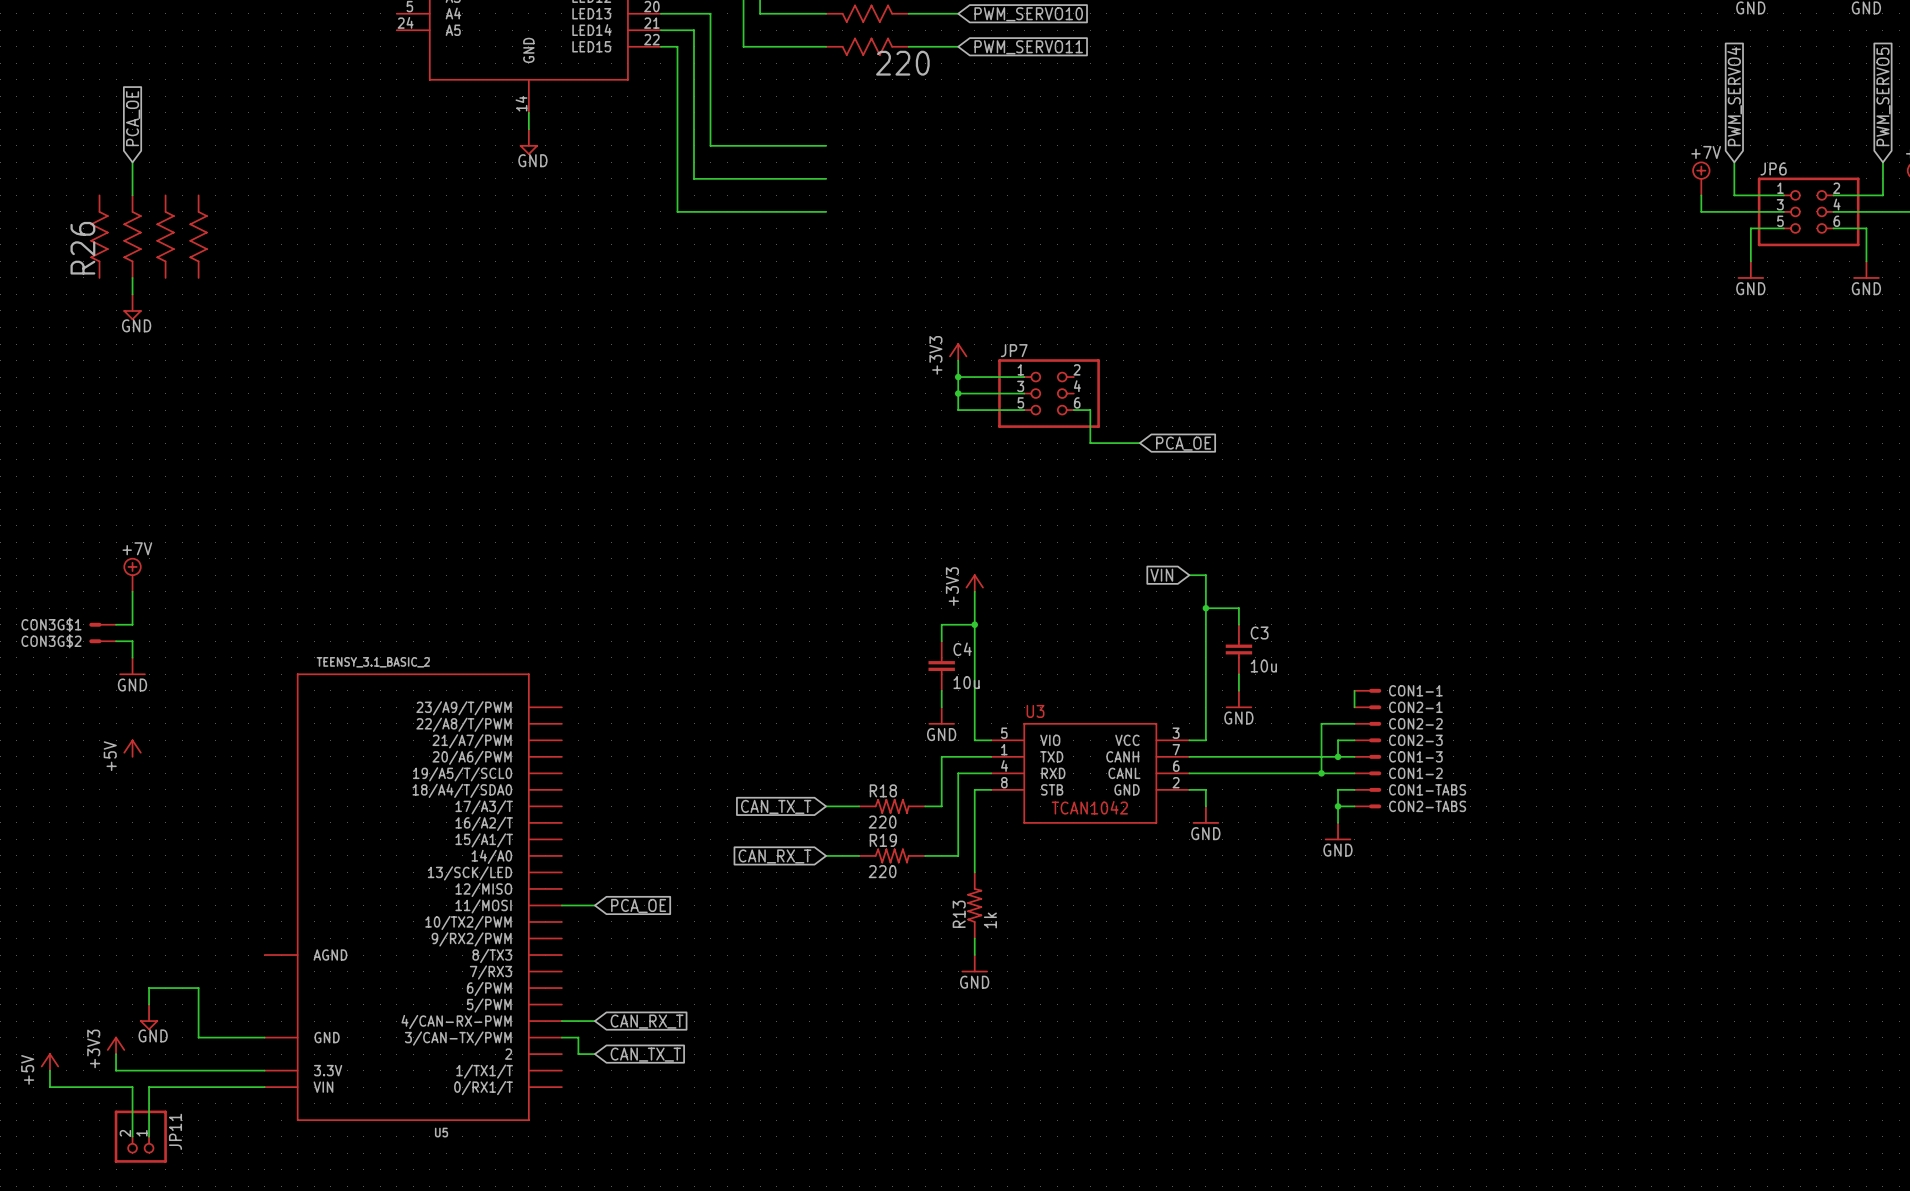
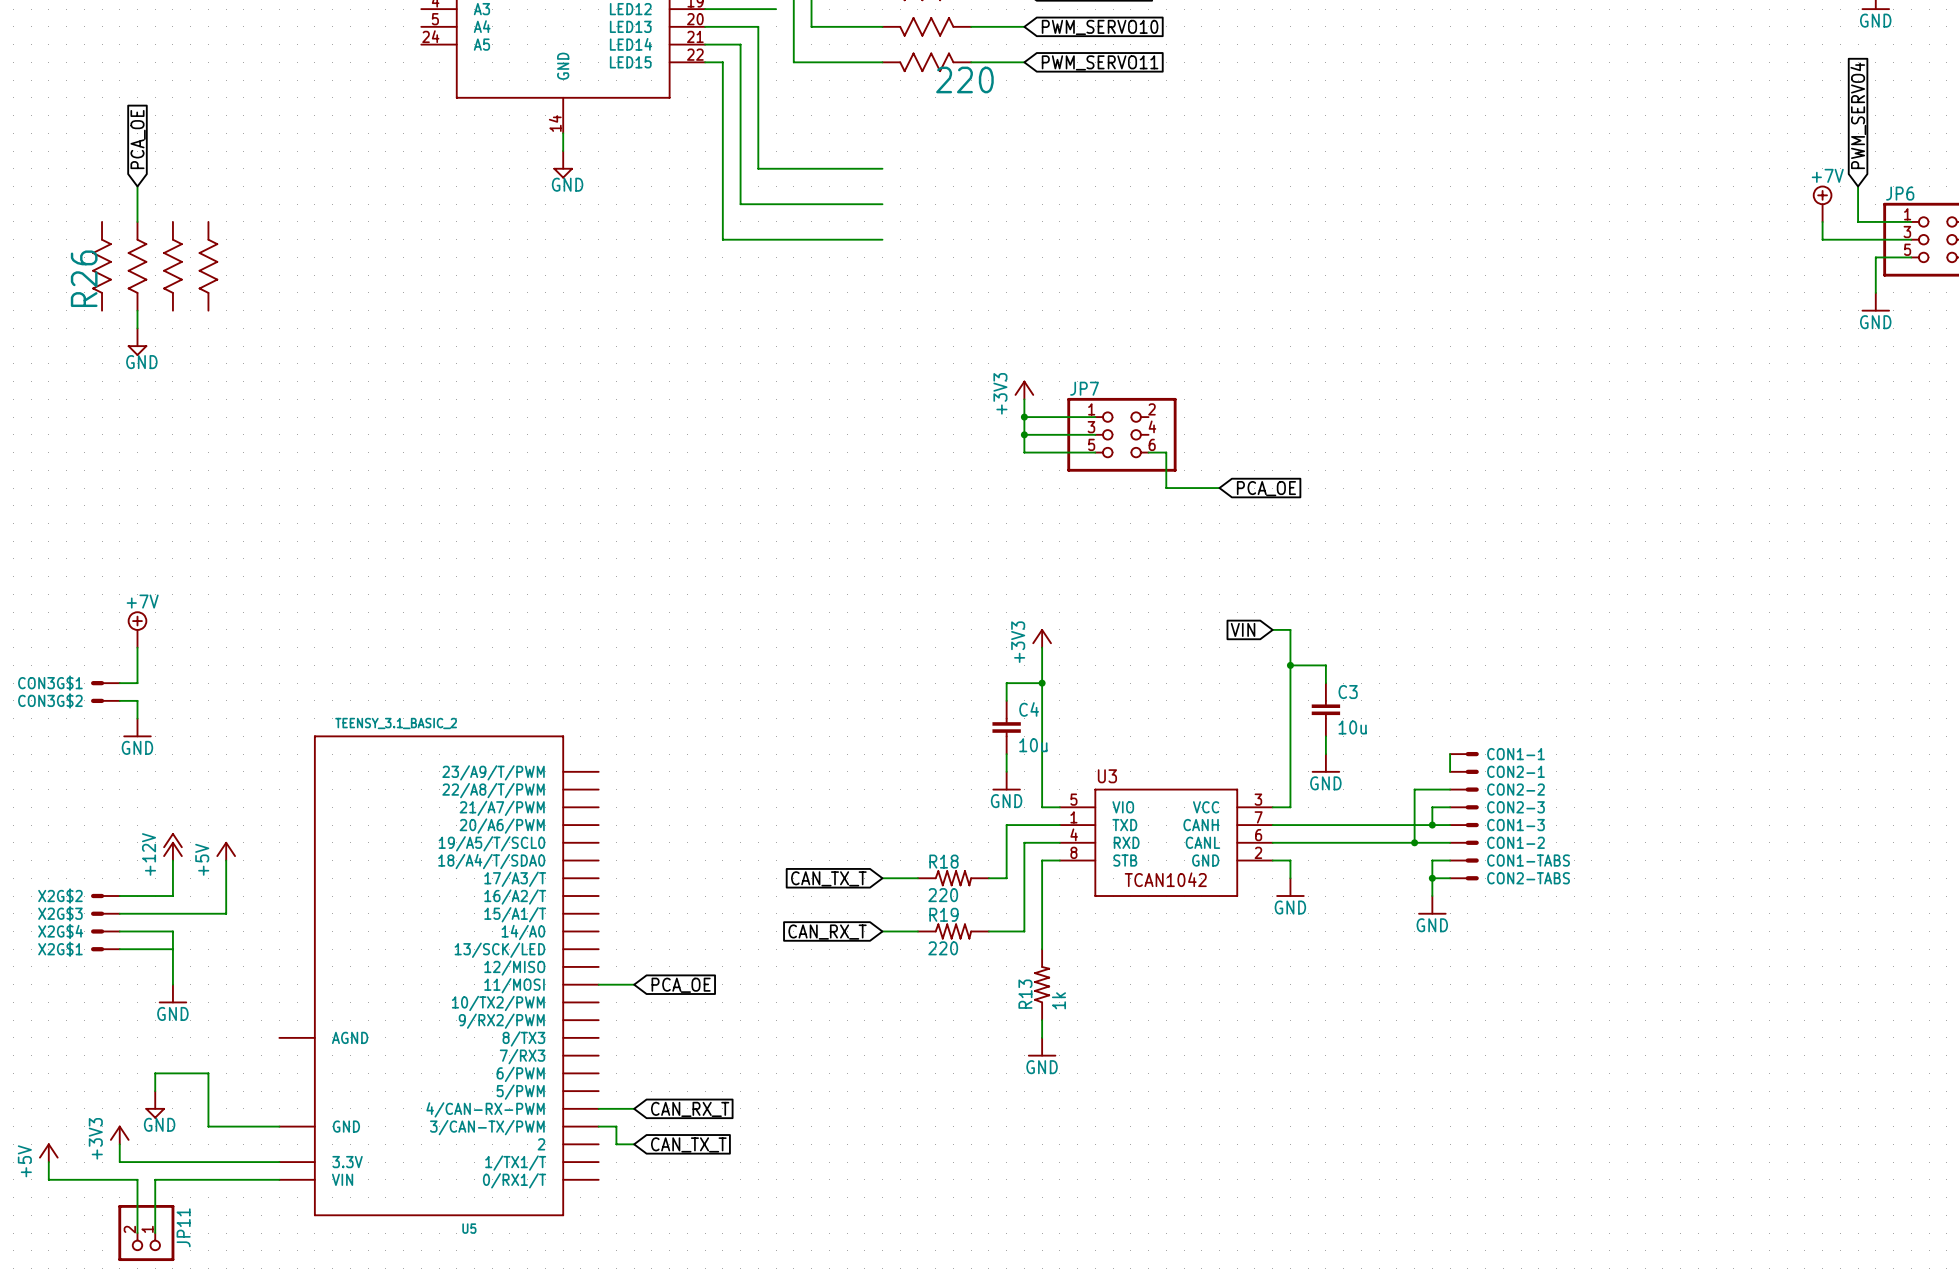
power symbol position: +5V (132, 748) -> +5V (226, 851)
power symbol: none -> +12V (172, 846)
wire: none -> (172, 860) (172, 896) (119, 896)
wire: none -> (226, 860) (226, 913) (119, 913)
X2G$2: none -> (105, 896)
X2G$3: none -> (105, 913)
X2G$4: none -> (105, 931)
wire: none -> (119, 931) (172, 931) (172, 984)
X2G$1: none -> (105, 949)
wire: none -> (119, 949) (172, 949)
power symbol: none -> GND (172, 994)

